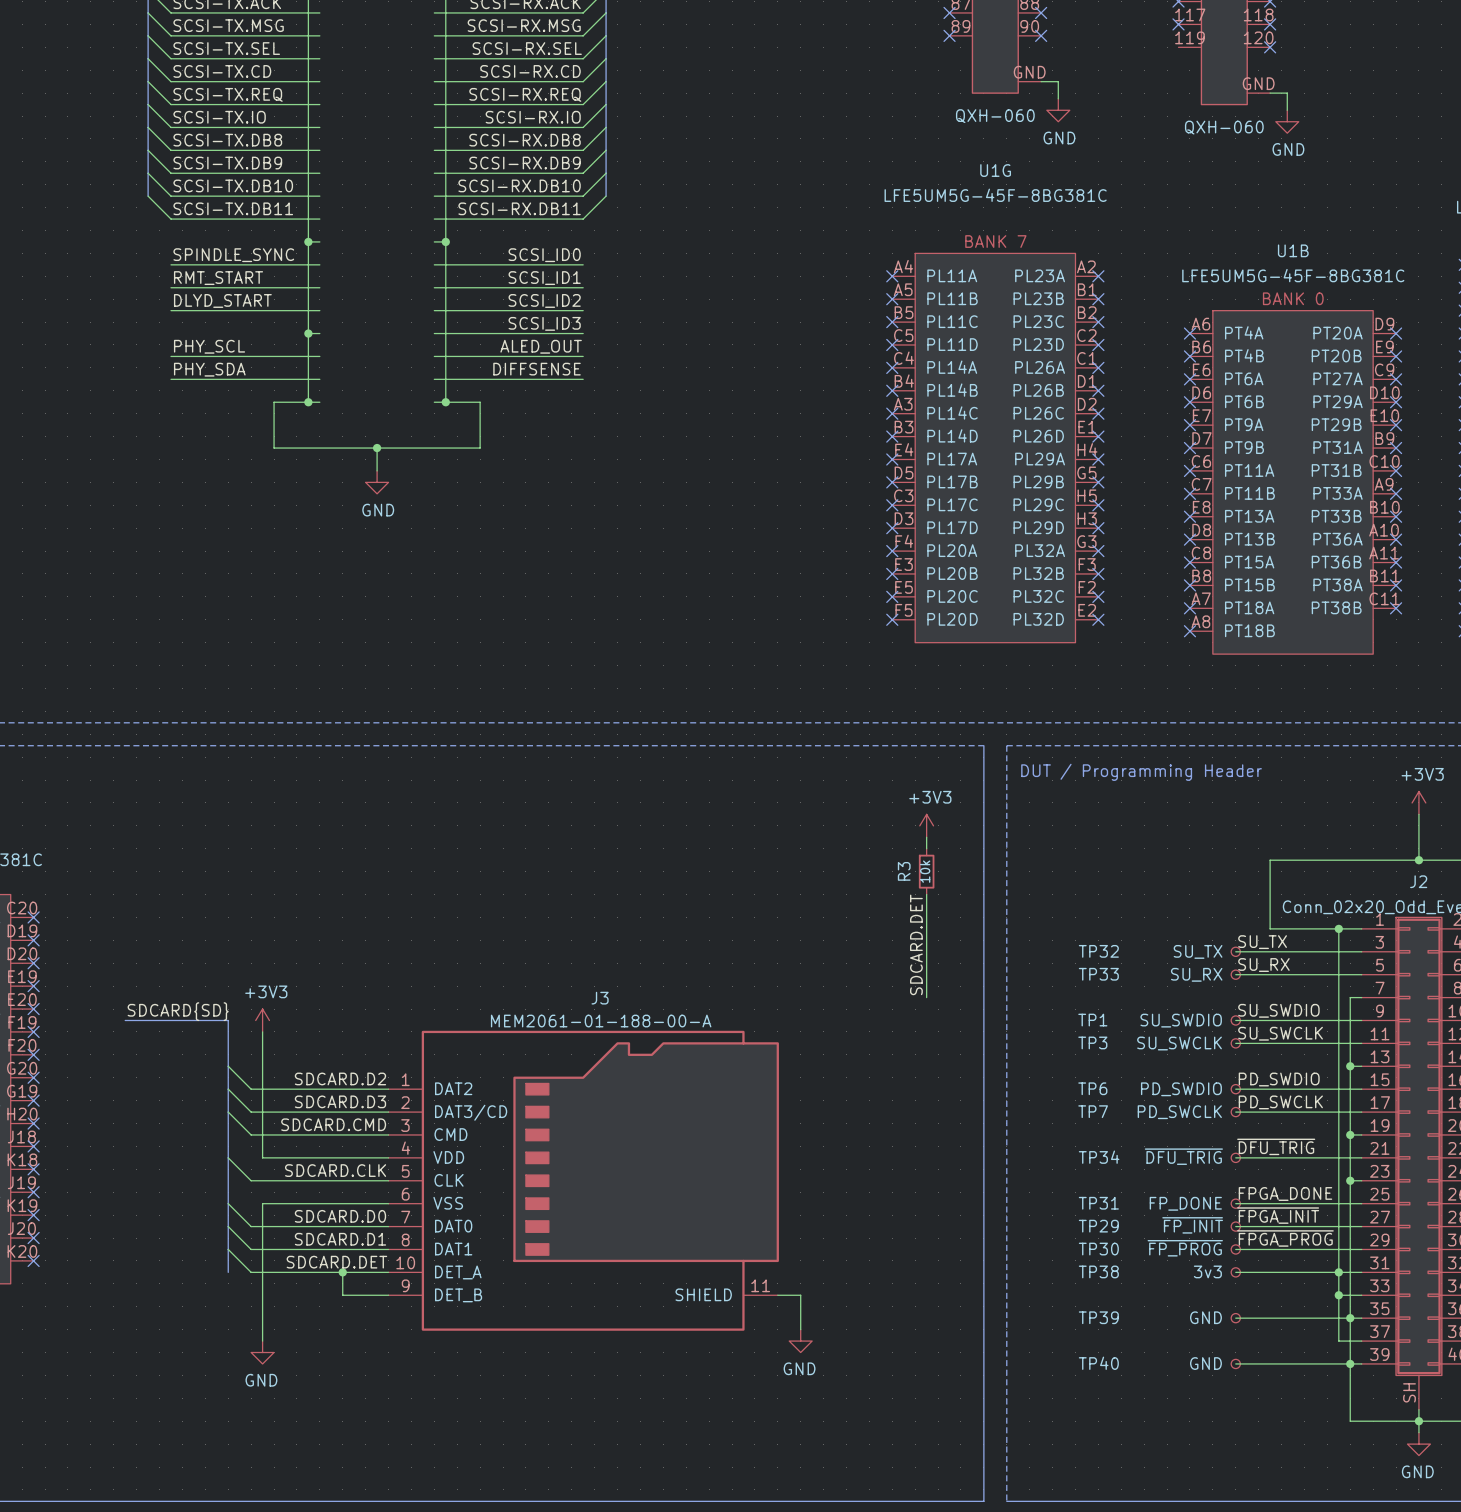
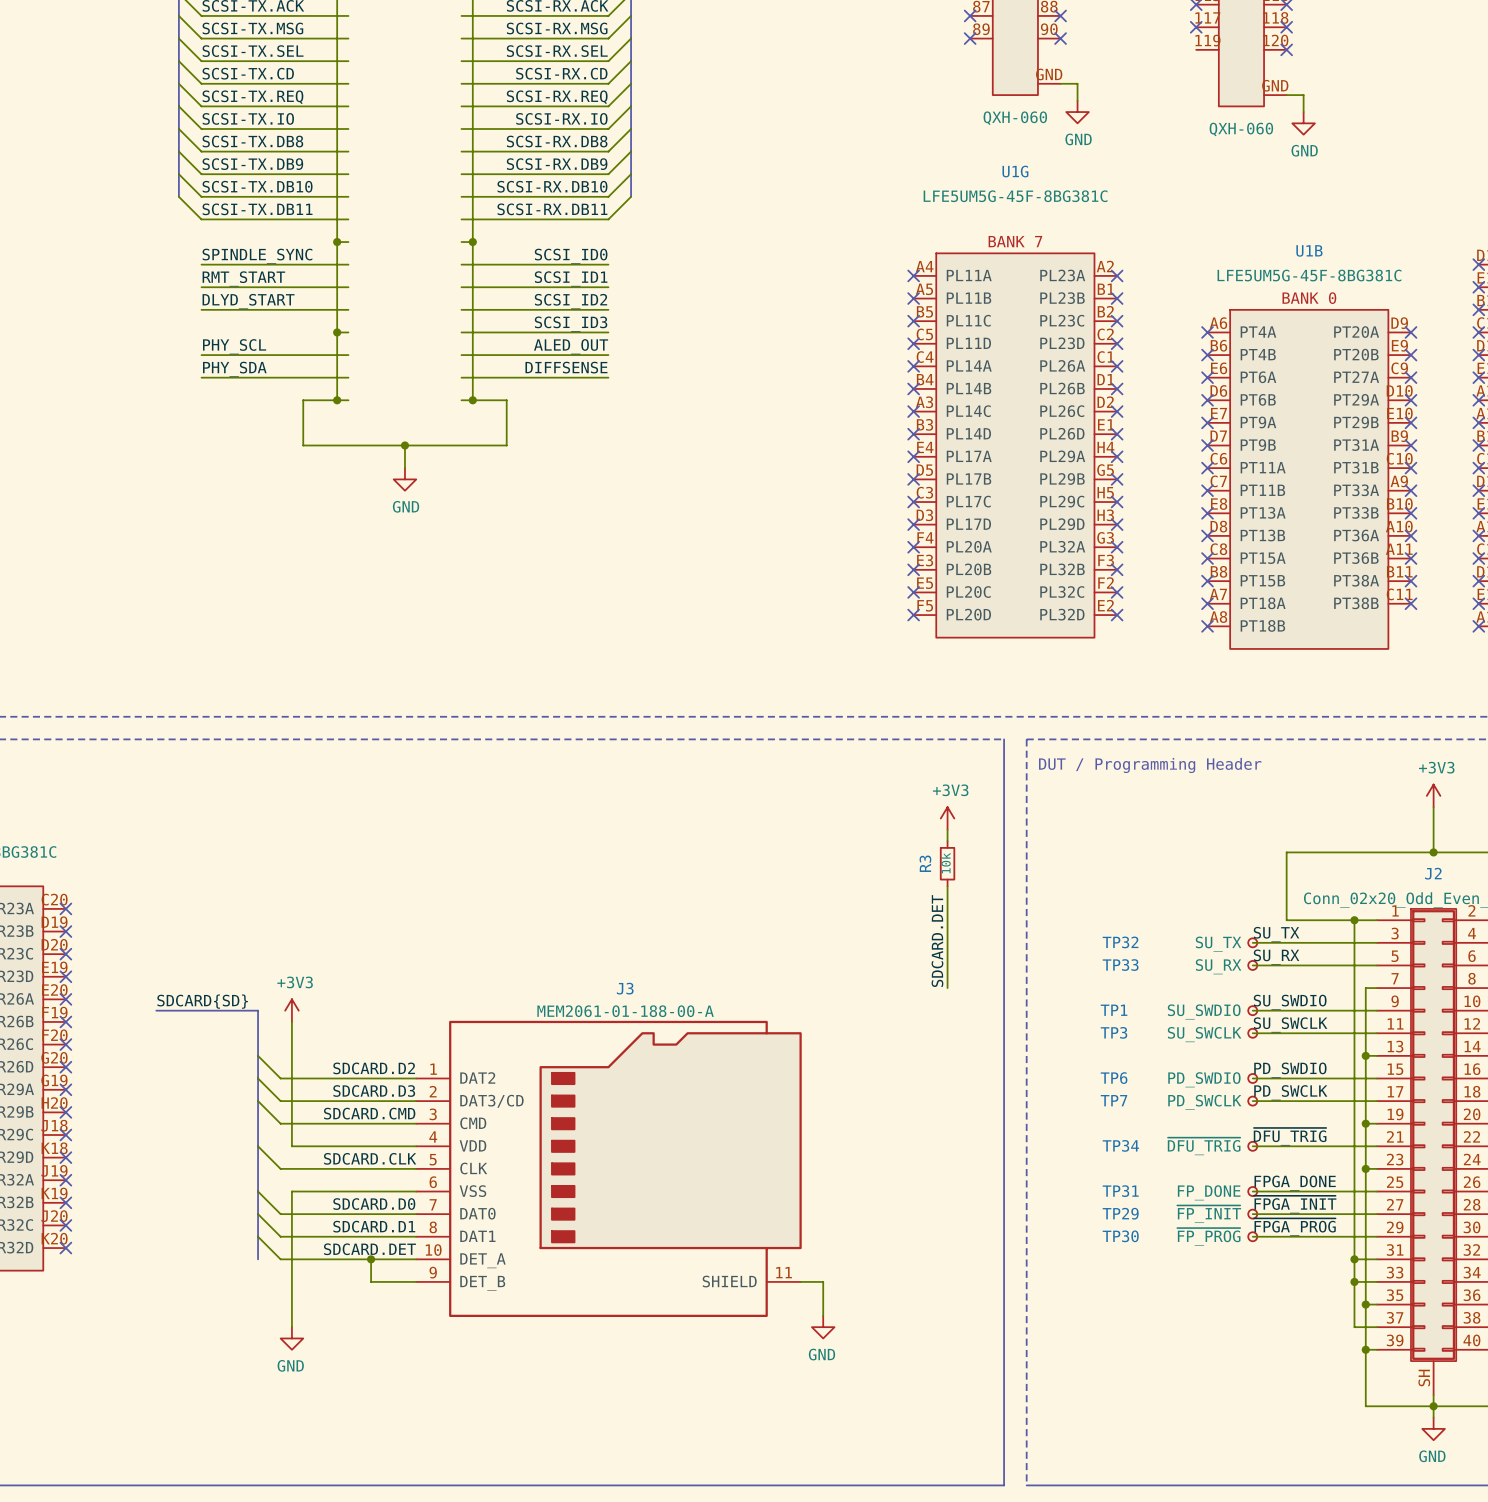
wire: (1235, 1272) (1338, 1272) -> none
TP38: 3v3 (1235, 1272) -> none
wire: (1235, 1318) (1350, 1318) -> none
TP39: GND (1235, 1318) -> none
wire: (1235, 1363) (1350, 1363) -> none
TP40: GND (1235, 1363) -> none

